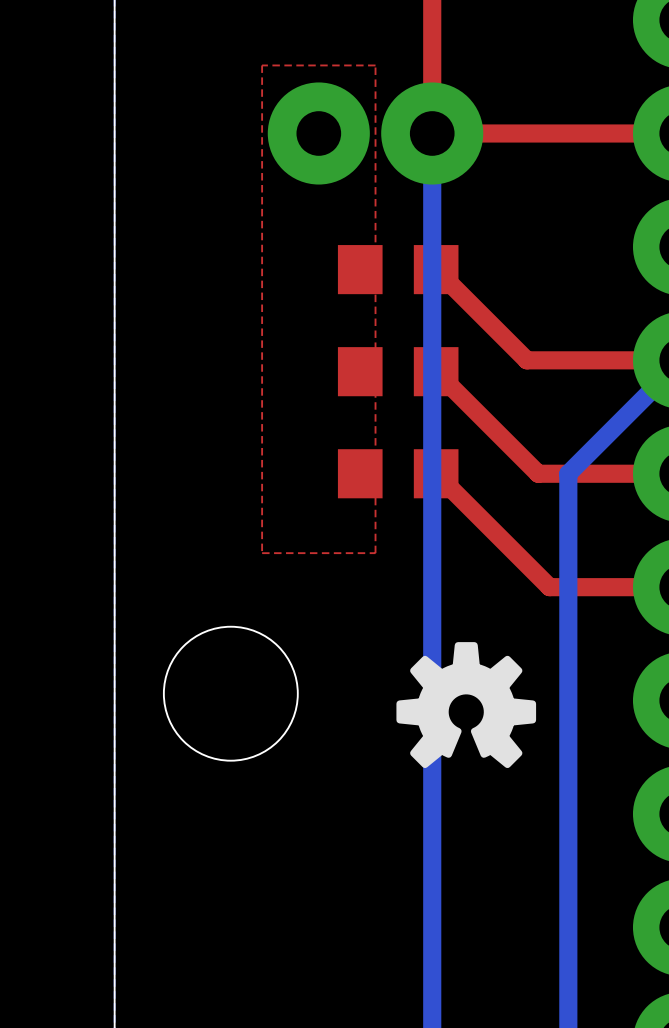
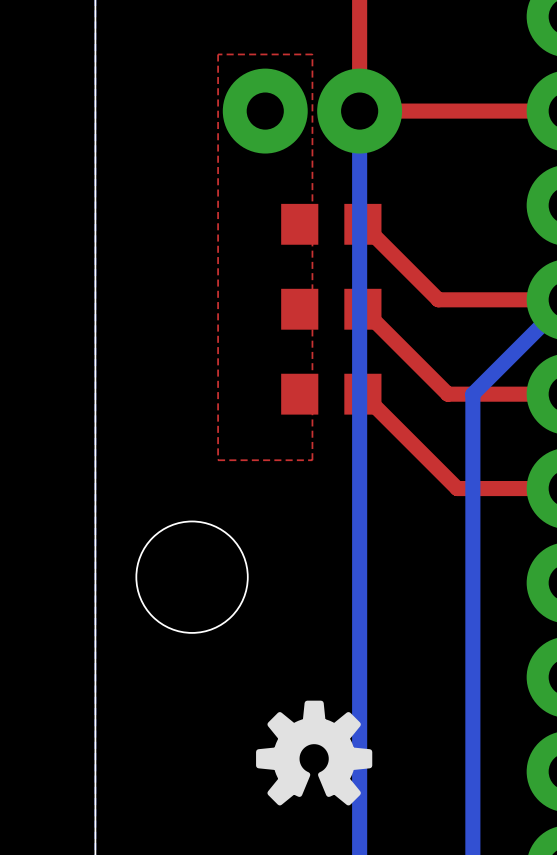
drawing position: (466, 705) -> (314, 753)

